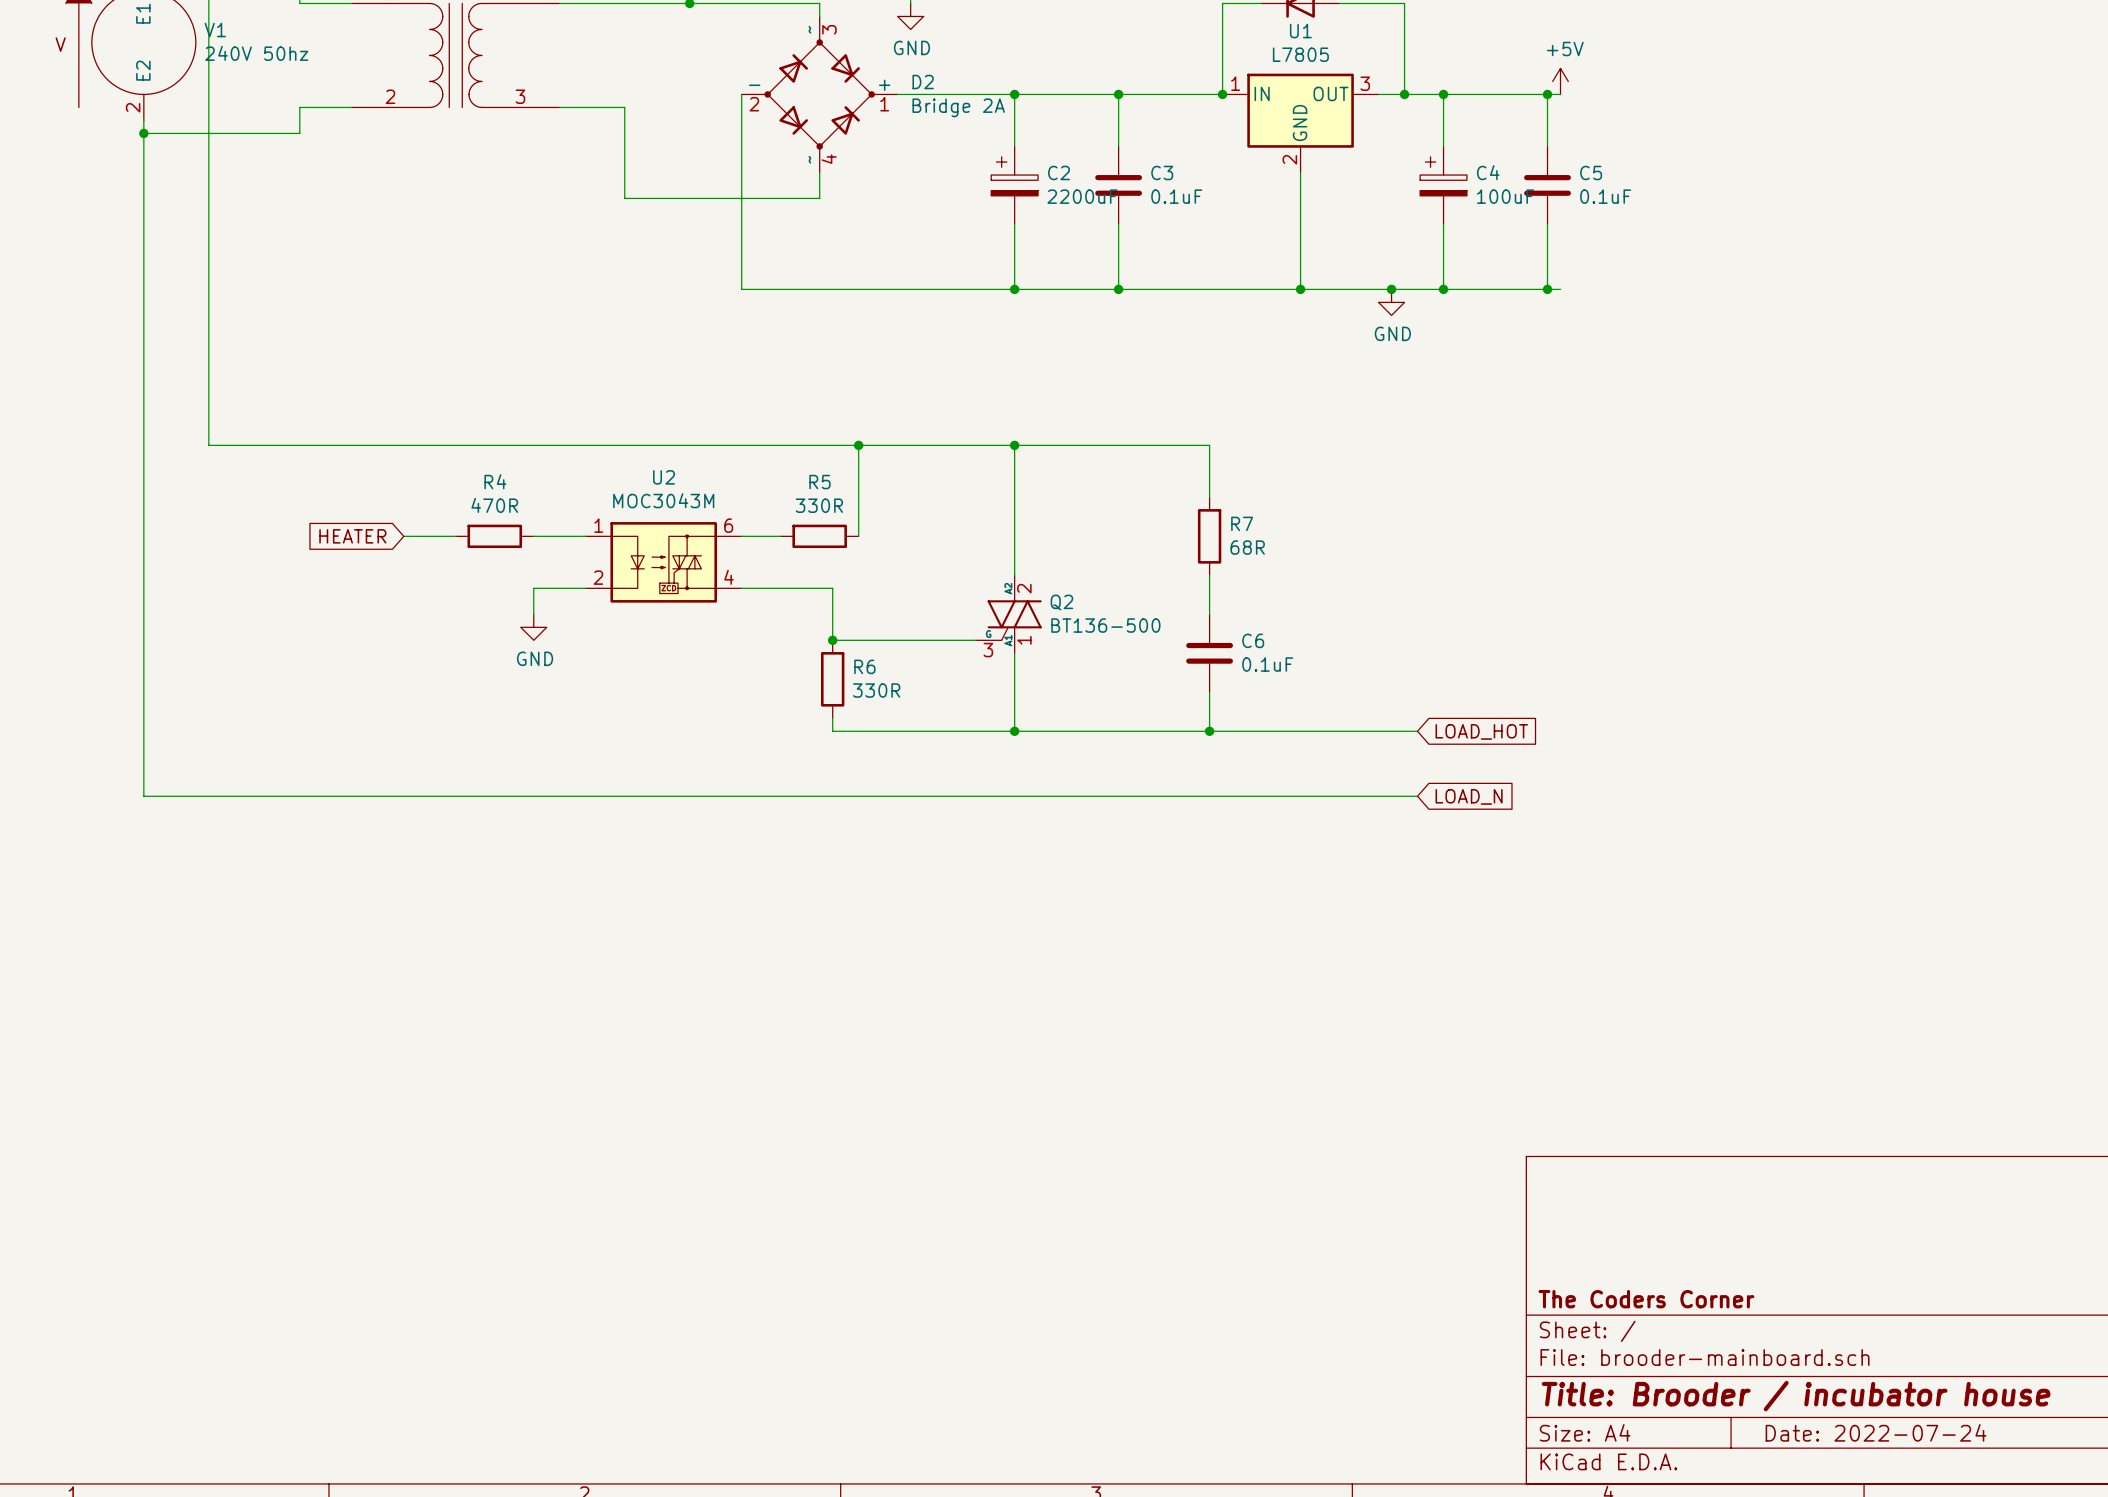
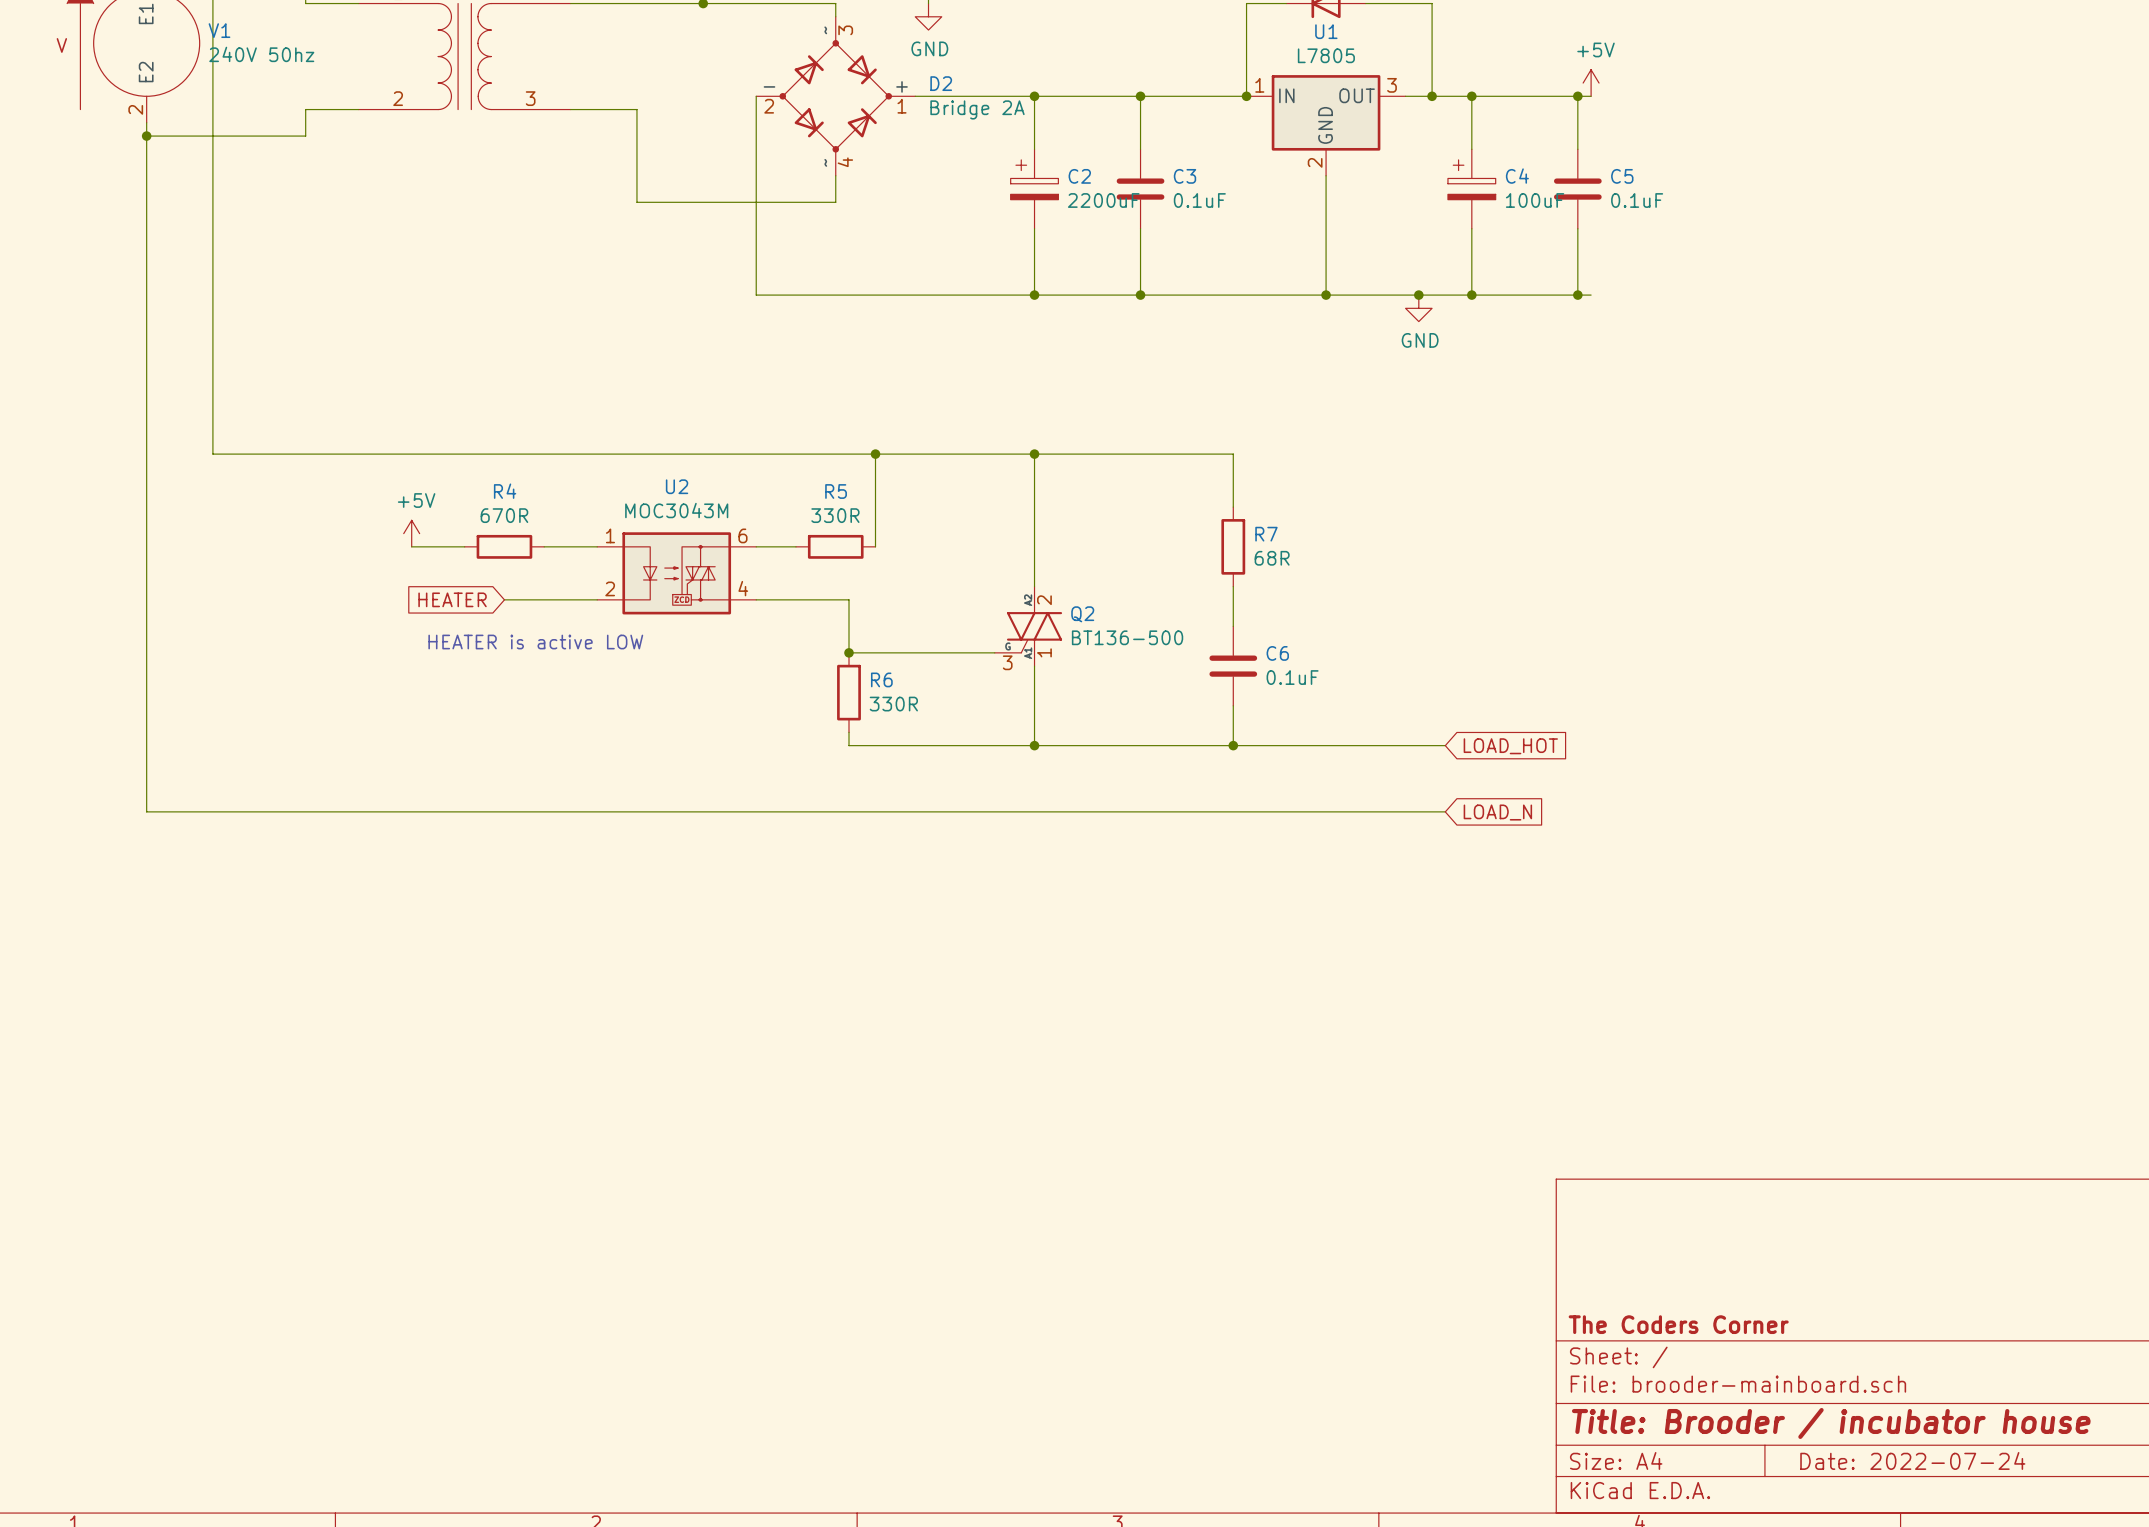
R4 value: 470R (494, 505) -> 670R (504, 515)
power symbol: none -> +5V (411, 533)
global label position: HEATER (352, 536) -> HEATER (452, 599)
wire: (533, 588) (533, 614) -> (544, 599) (504, 599)
power symbol: GND (533, 627) -> none
text: none -> HEATER is active LOW (535, 642)

